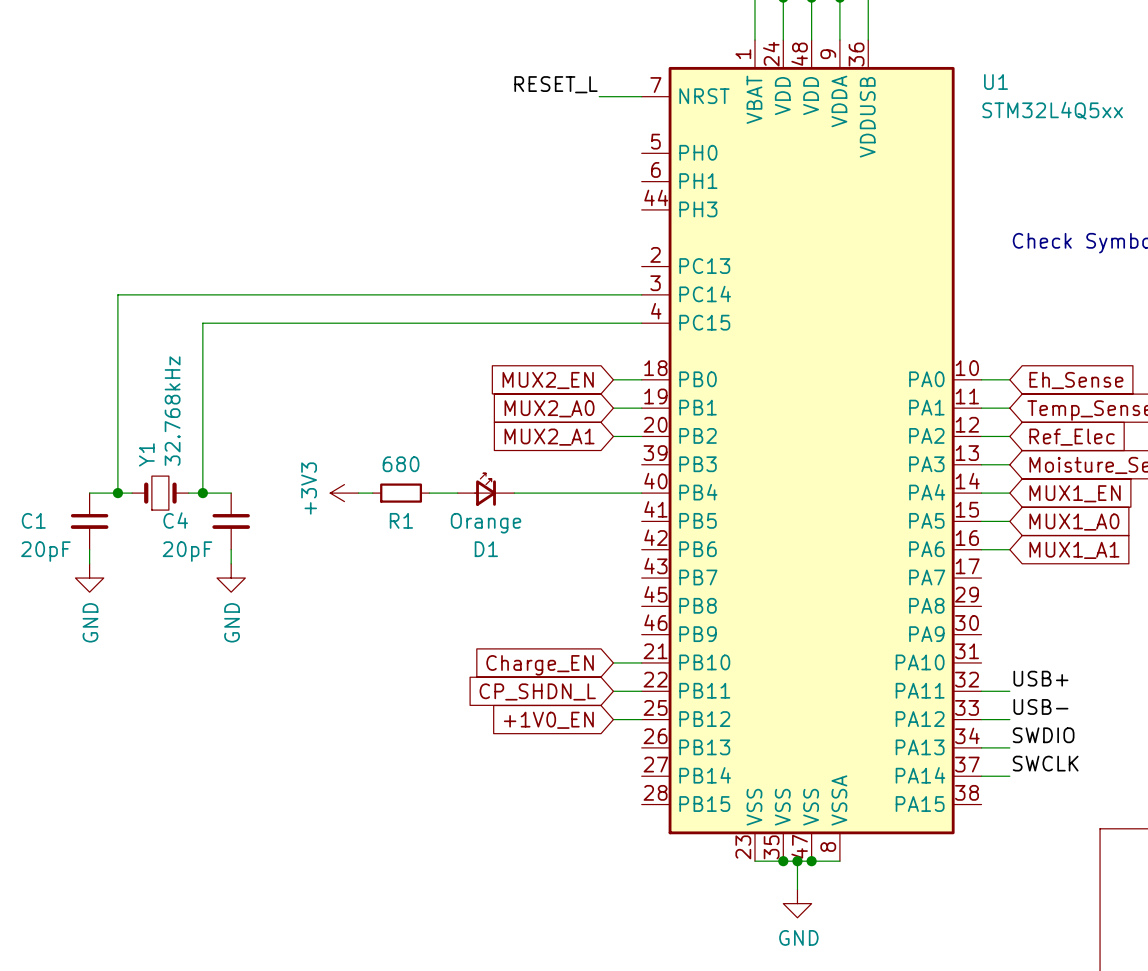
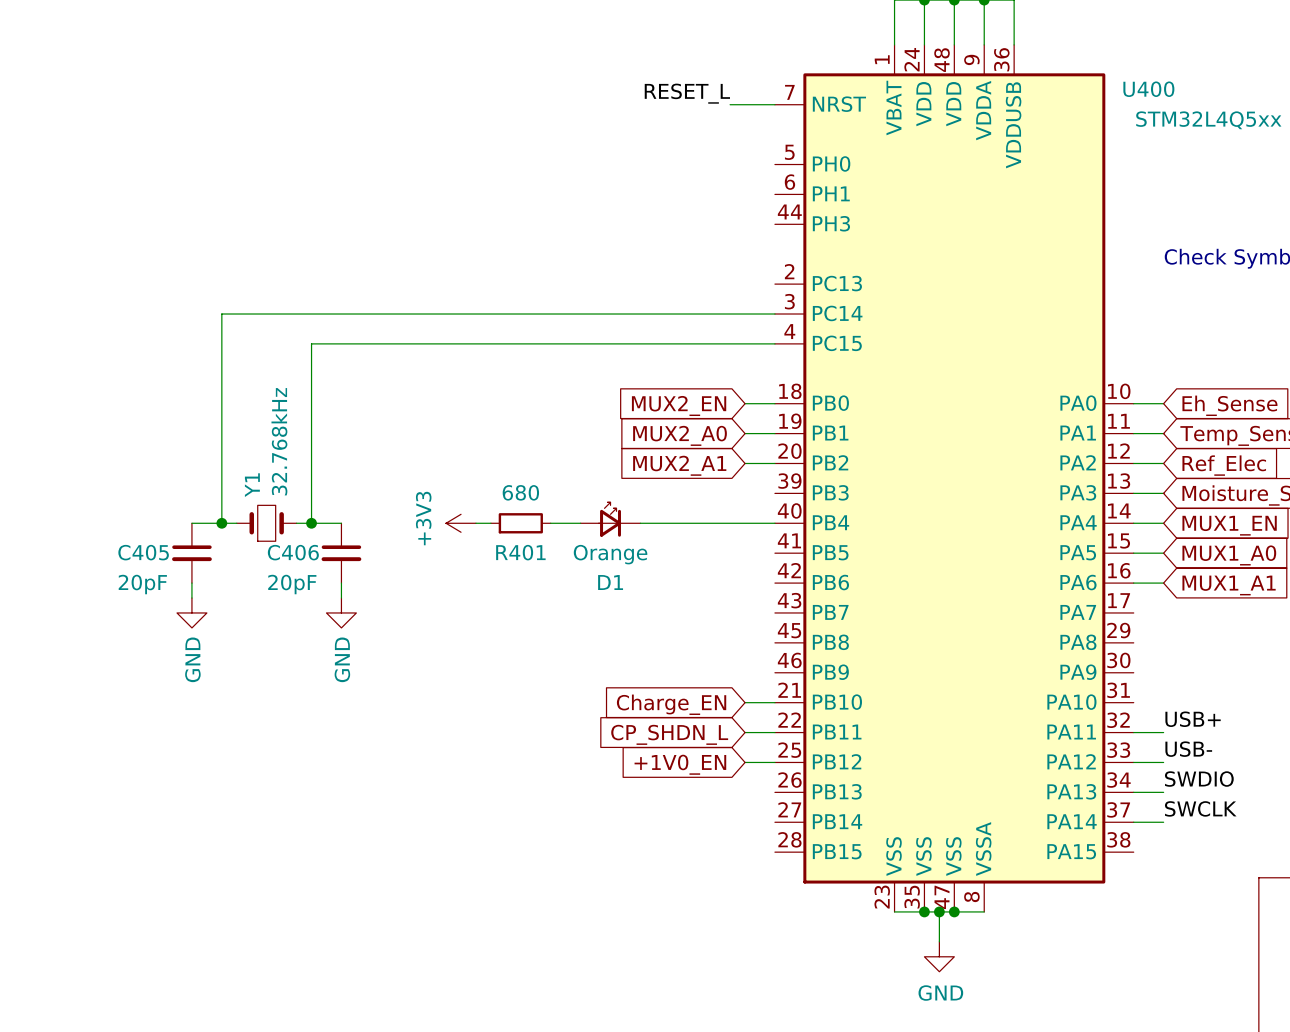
U1 name: U1 (996, 82) -> U400 (1148, 89)
C1 name: C1 (33, 520) -> C405 (143, 552)
C4 name: C4 (175, 520) -> C406 (293, 552)
R1 name: R1 (401, 520) -> R401 (520, 552)

